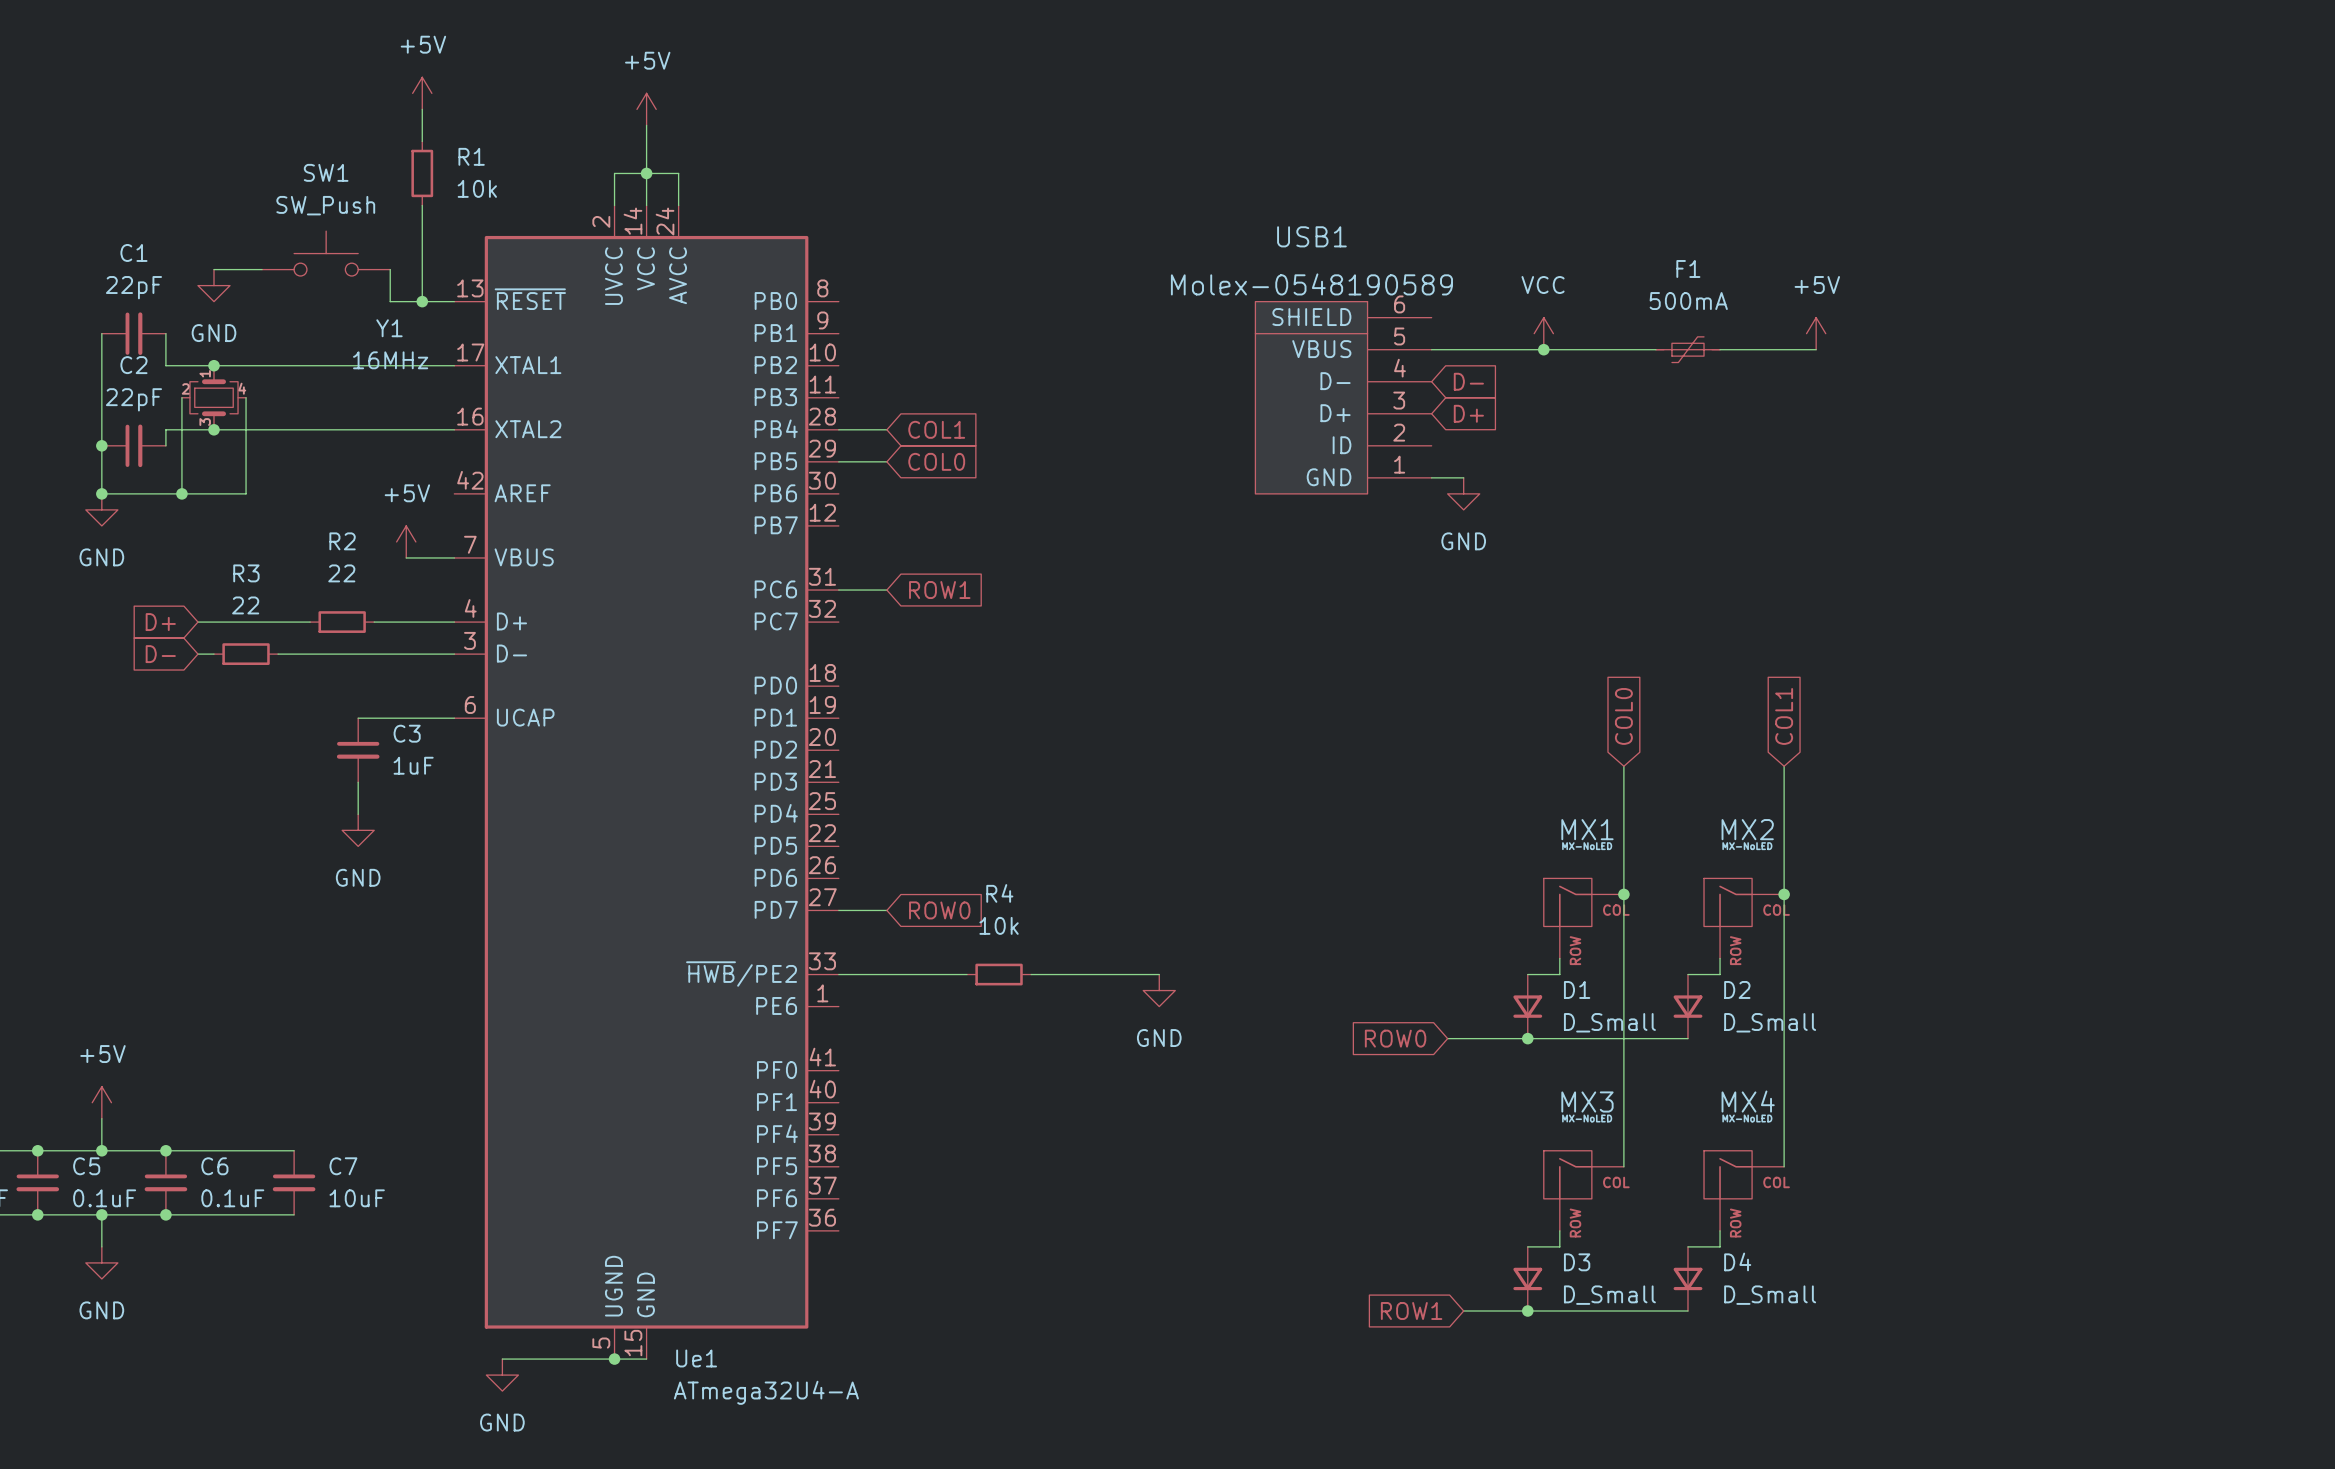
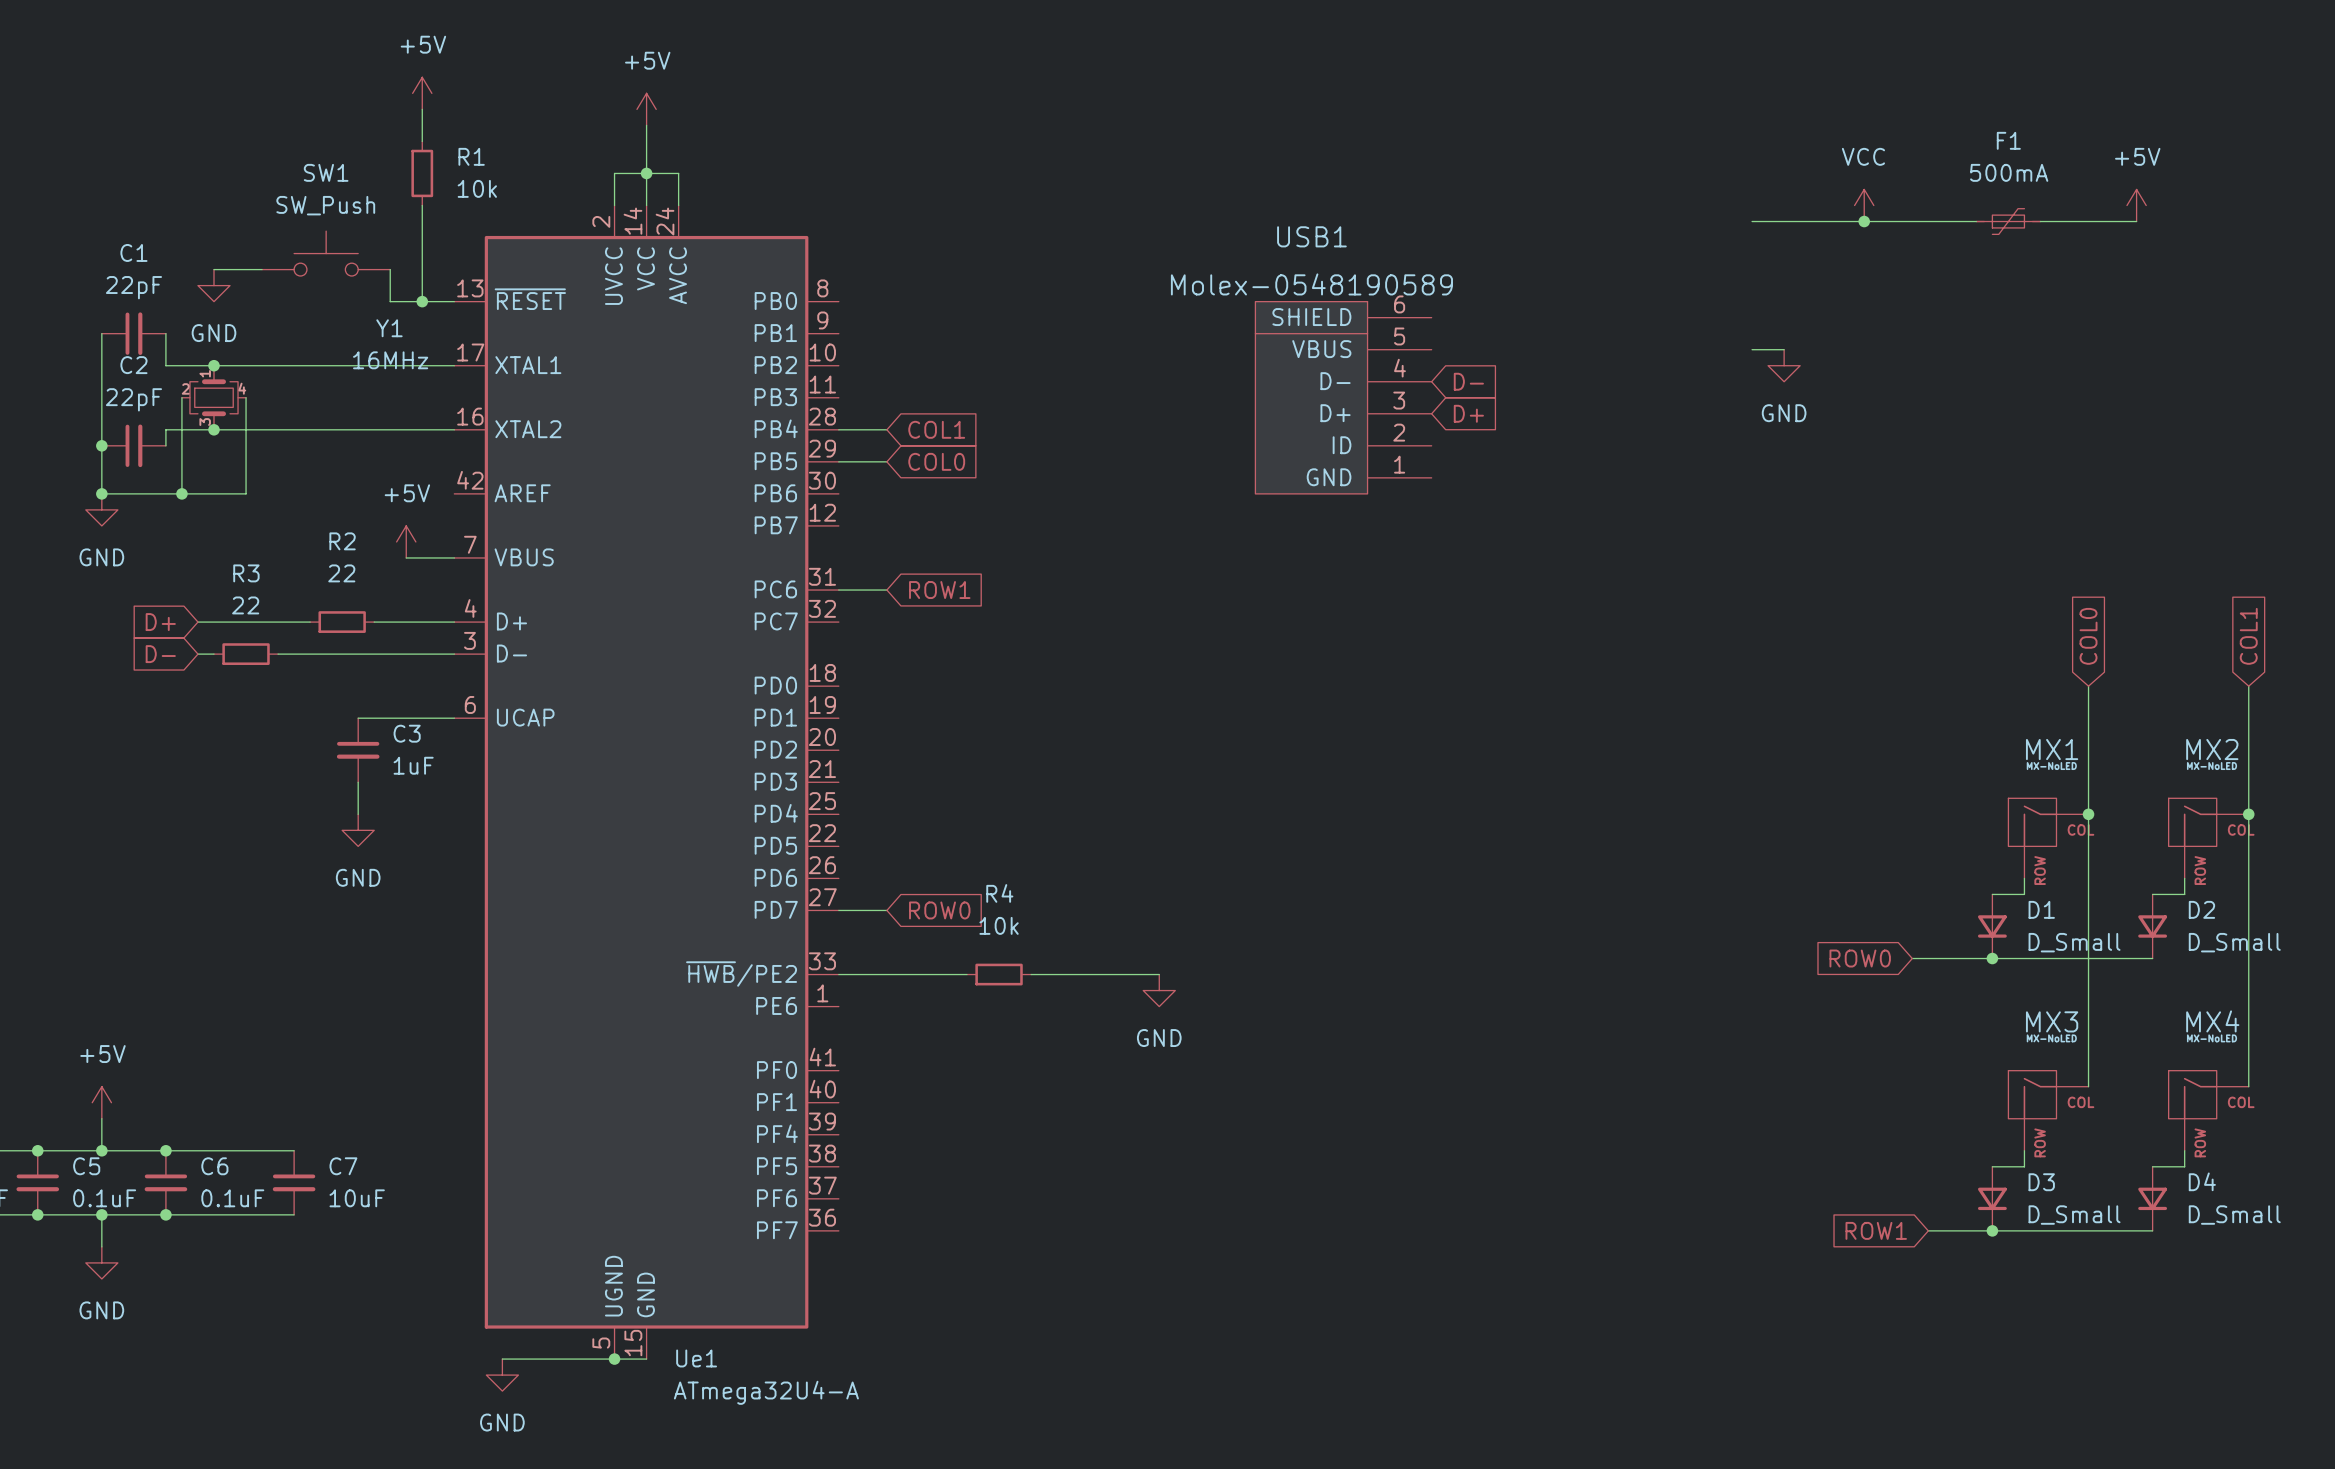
power symbol: none -> VCC (1864, 205)
power symbol: none -> +5V (2136, 205)
wire: none -> (1752, 221) (1976, 221)
junction: none -> (1864, 221)
wire: none -> (2040, 221) (2136, 221)
power symbol: VCC (1543, 333) -> none
power symbol: +5V (1816, 333) -> none
wire: (1431, 349) (1655, 349) -> none
junction: (1543, 349) -> none
F1 position: (1687, 349) -> (2008, 221)
wire: (1720, 349) (1752, 349) -> none
wire: (1784, 349) (1816, 349) -> none
power symbol: none -> GND (1784, 365)
wire: (1431, 477) (1463, 477) -> none
power symbol: GND (1463, 493) -> none
global label: none -> COL0 (2088, 636)
global label: none -> COL1 (2248, 636)
wire: none -> (2248, 686) (2248, 1086)
global label: COL0 (1623, 716) -> none
global label: COL1 (1784, 716) -> none
wire: (1623, 766) (1623, 1166) -> none
wire: (1784, 766) (1784, 1166) -> (2088, 686) (2088, 1086)
junction: none -> (2088, 814)
junction: none -> (2248, 814)
wire: none -> (2184, 878) (2184, 894) (2152, 894)
junction: (1623, 894) -> none
junction: (1784, 894) -> none
MX1 position: (1583, 918) -> (2048, 838)
MX2 position: (1744, 918) -> (2208, 838)
wire: (1559, 958) (1559, 974) (1527, 974) -> none
wire: (1720, 958) (1720, 974) (1687, 974) -> (2024, 878) (2024, 894) (1992, 894)
global label: none -> ROW0 (1860, 958)
wire: none -> (1912, 958) (2152, 958)
junction: none -> (1992, 958)
D1 position: (1527, 1006) -> (1992, 926)
D2 position: (1687, 1006) -> (2152, 926)
global label: ROW0 (1395, 1038) -> none
wire: (1447, 1038) (1687, 1038) -> none
junction: (1527, 1038) -> none
wire: none -> (2184, 1150) (2184, 1166) (2152, 1166)
MX3 position: (1583, 1190) -> (2048, 1110)
MX4 position: (1744, 1190) -> (2208, 1110)
wire: (1559, 1230) (1559, 1246) (1527, 1246) -> none
wire: (1720, 1230) (1720, 1246) (1687, 1246) -> (2024, 1150) (2024, 1166) (1992, 1166)
global label: none -> ROW1 (1876, 1230)
wire: none -> (1928, 1230) (2152, 1230)
junction: none -> (1992, 1230)
D3 position: (1527, 1278) -> (1992, 1198)
D4 position: (1687, 1278) -> (2152, 1198)
global label: ROW1 (1411, 1310) -> none
wire: (1463, 1310) (1687, 1310) -> none
junction: (1527, 1310) -> none

